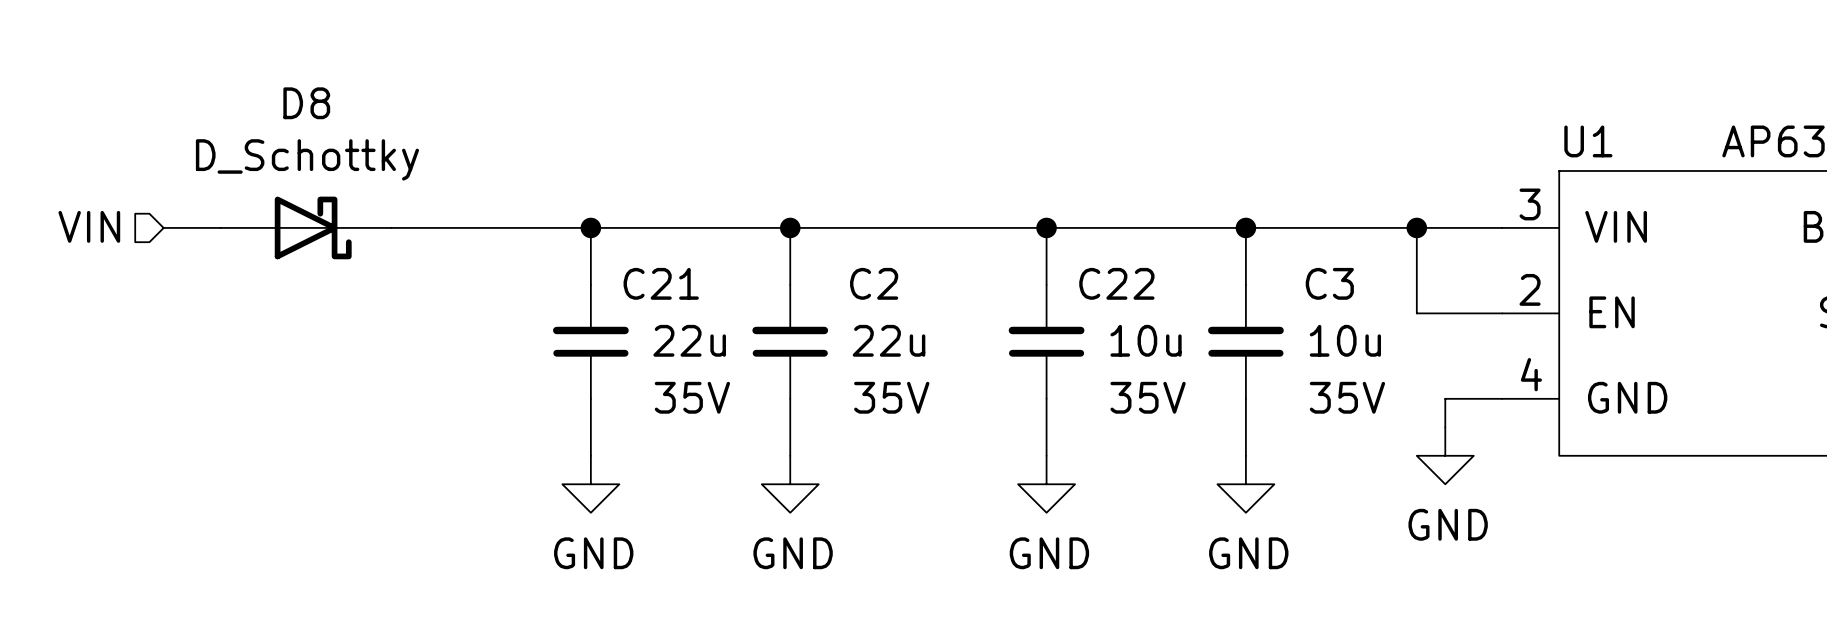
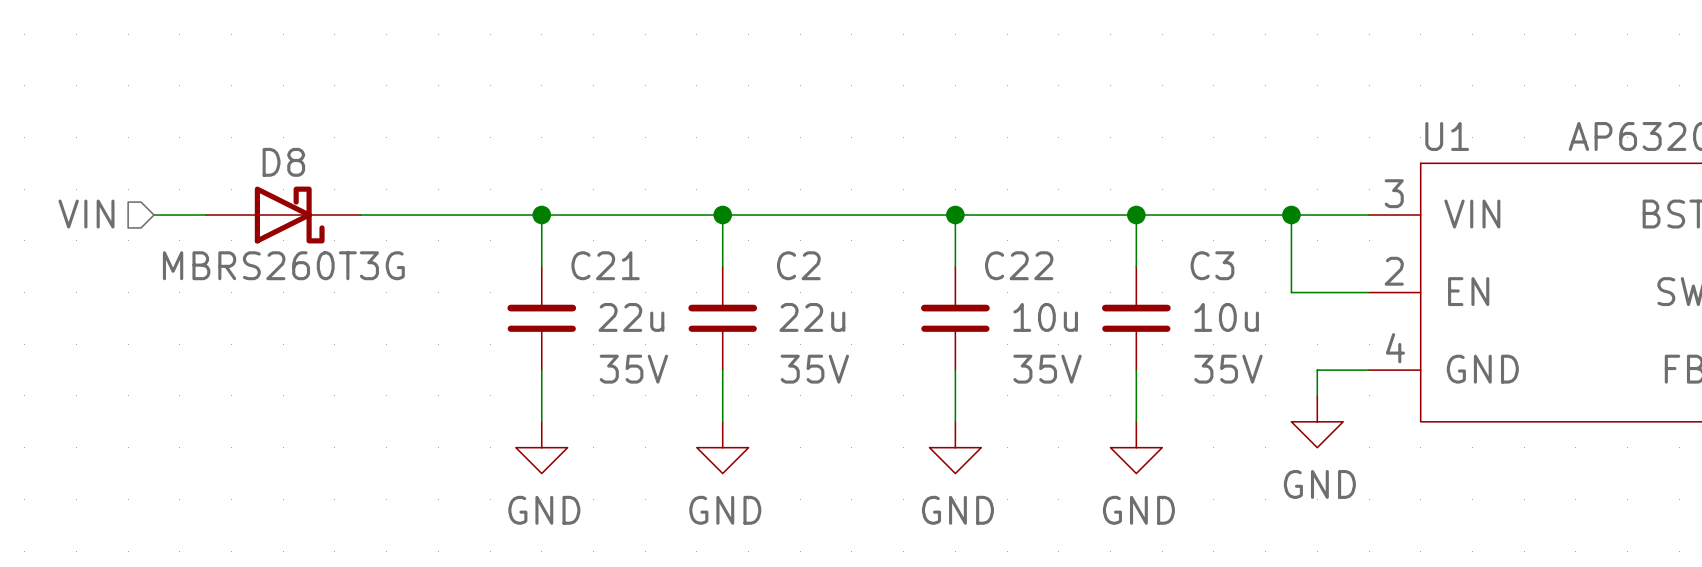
D8 name position: D8 (306, 103) -> D8 (283, 162)
D8 value: D_Schottky (307, 159) -> none
D8 text: none -> MBRS260T3G (283, 265)

